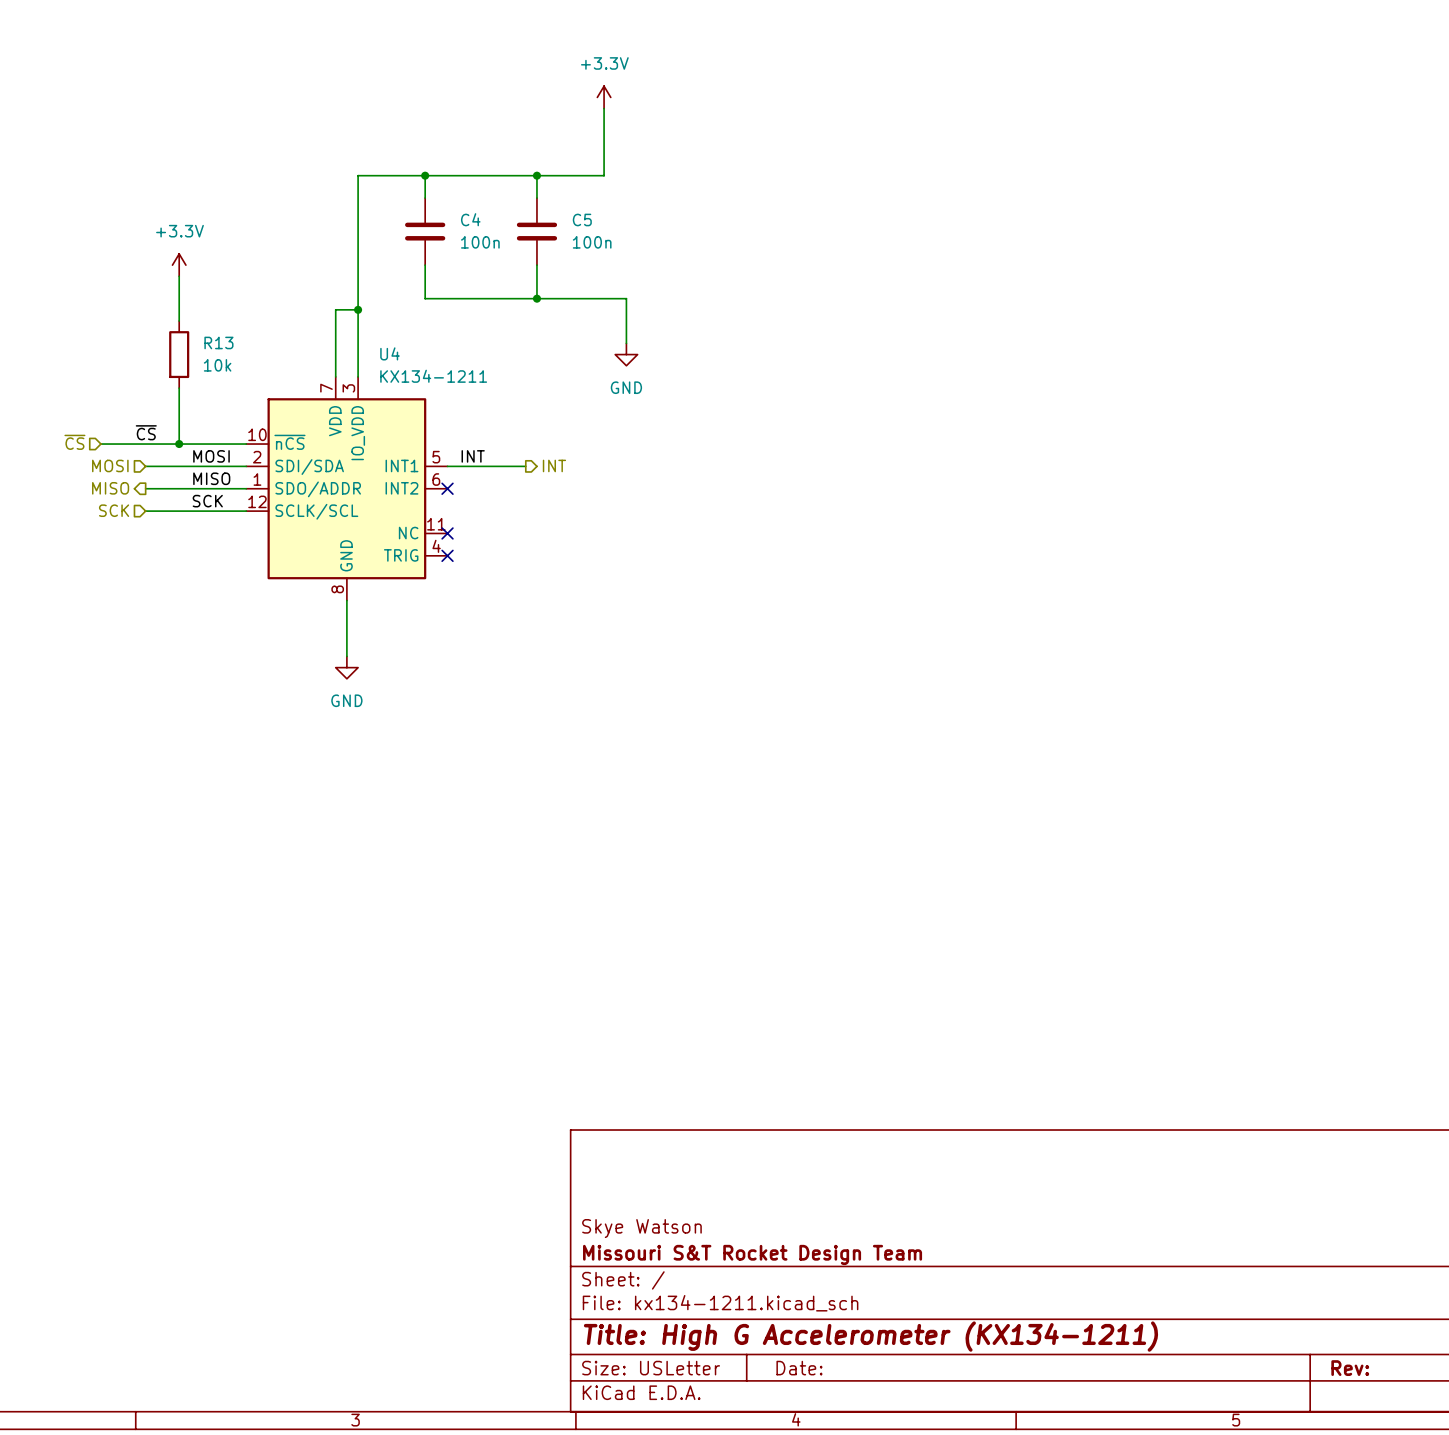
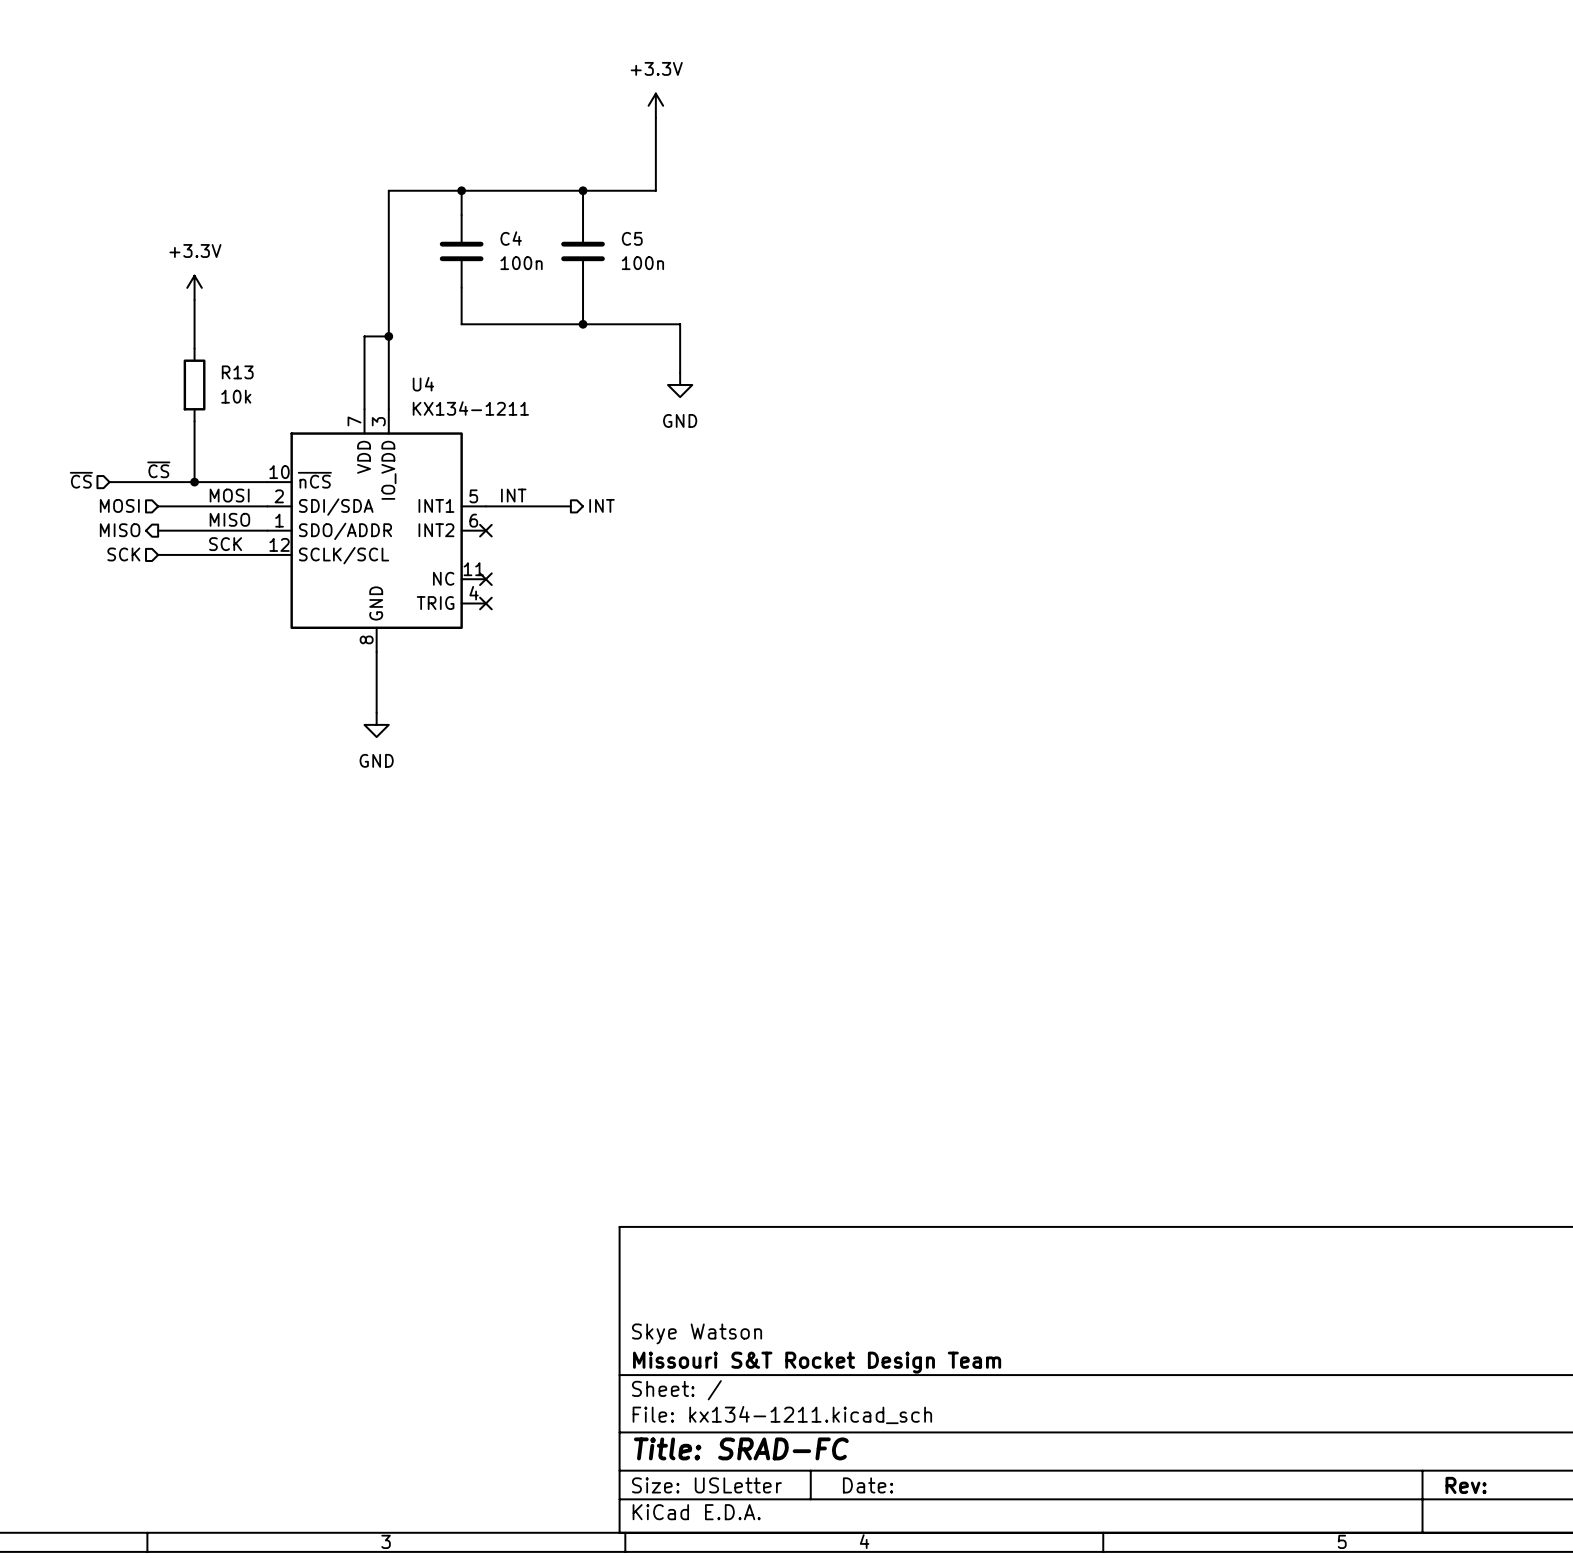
title block: Title: High G Accelerometer (KX134-1211) (870, 1336) -> Title: SRAD-FC (741, 1448)

